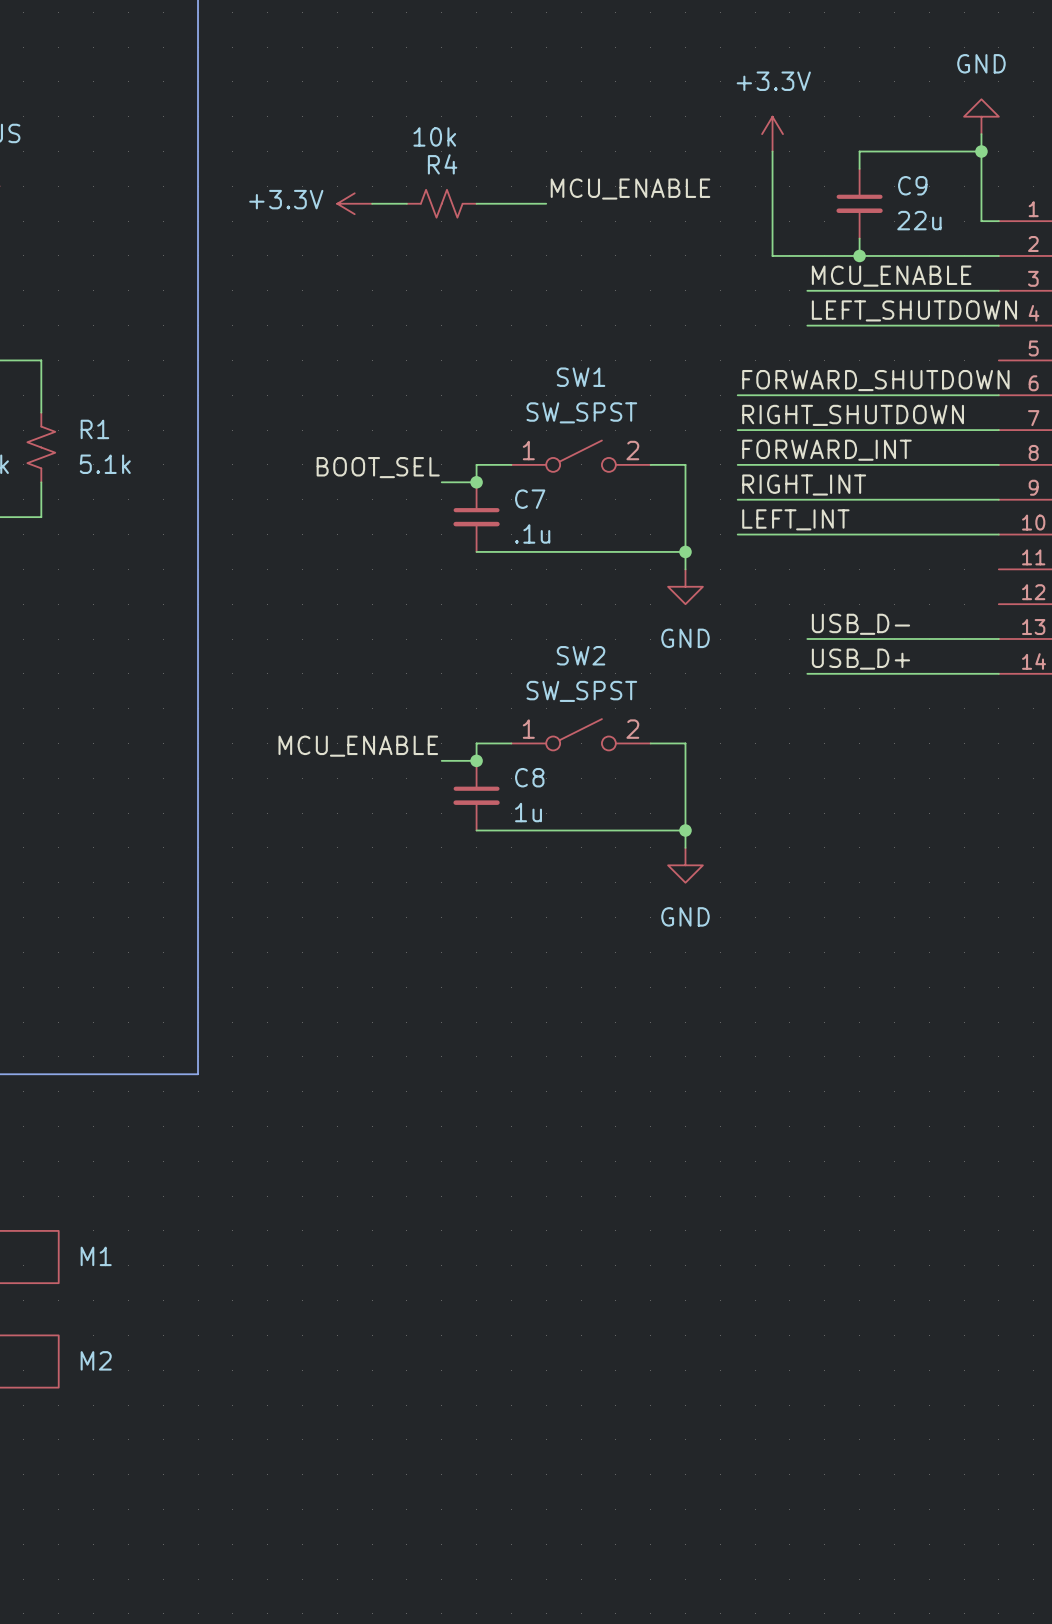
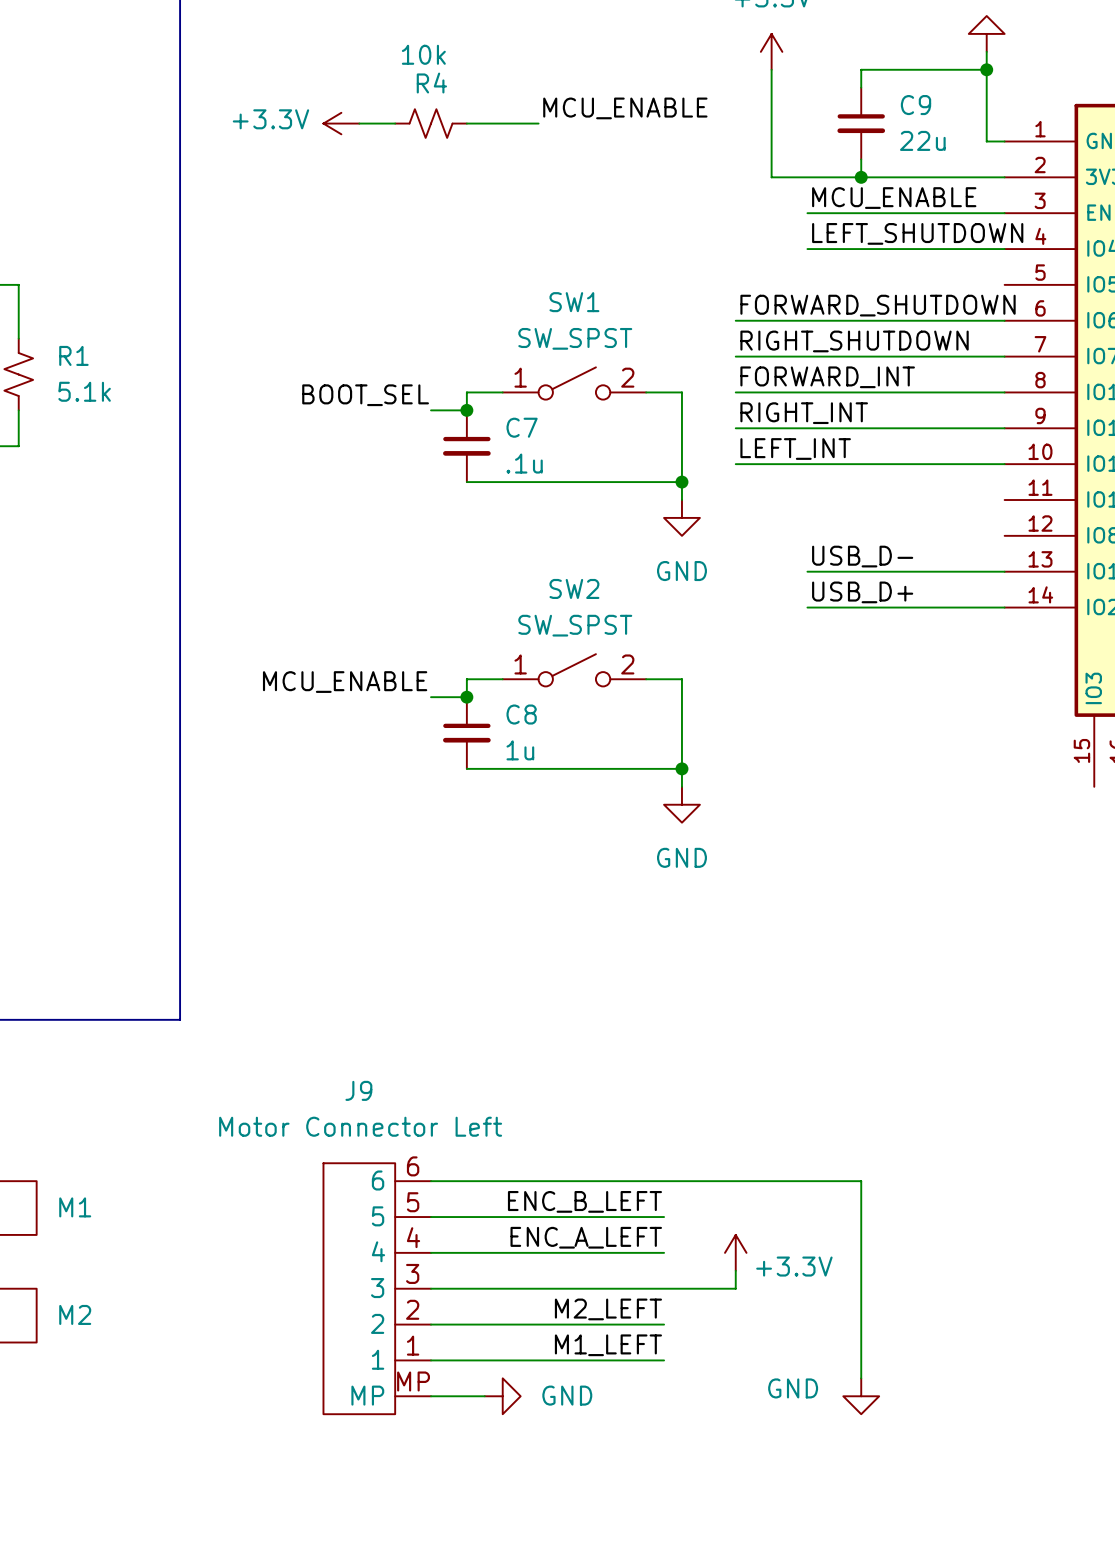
wire: none -> (431, 1181) (861, 1181) (861, 1378)
label: none -> ENC_B_LEFT (584, 1201)
wire: none -> (431, 1217) (664, 1217)
label: none -> ENC_A_LEFT (586, 1237)
wire: none -> (431, 1252) (664, 1252)
power symbol: none -> +3.3V (735, 1252)
wire: none -> (735, 1270) (735, 1288) (431, 1288)
J9: none -> Motor Connector Left (377, 1288)
label: none -> M2_LEFT (608, 1309)
wire: none -> (431, 1324) (664, 1324)
label: none -> M1_LEFT (608, 1345)
wire: none -> (431, 1360) (664, 1360)
wire: none -> (431, 1396) (484, 1396)
power symbol: none -> GND (502, 1396)
power symbol: none -> GND (861, 1396)

